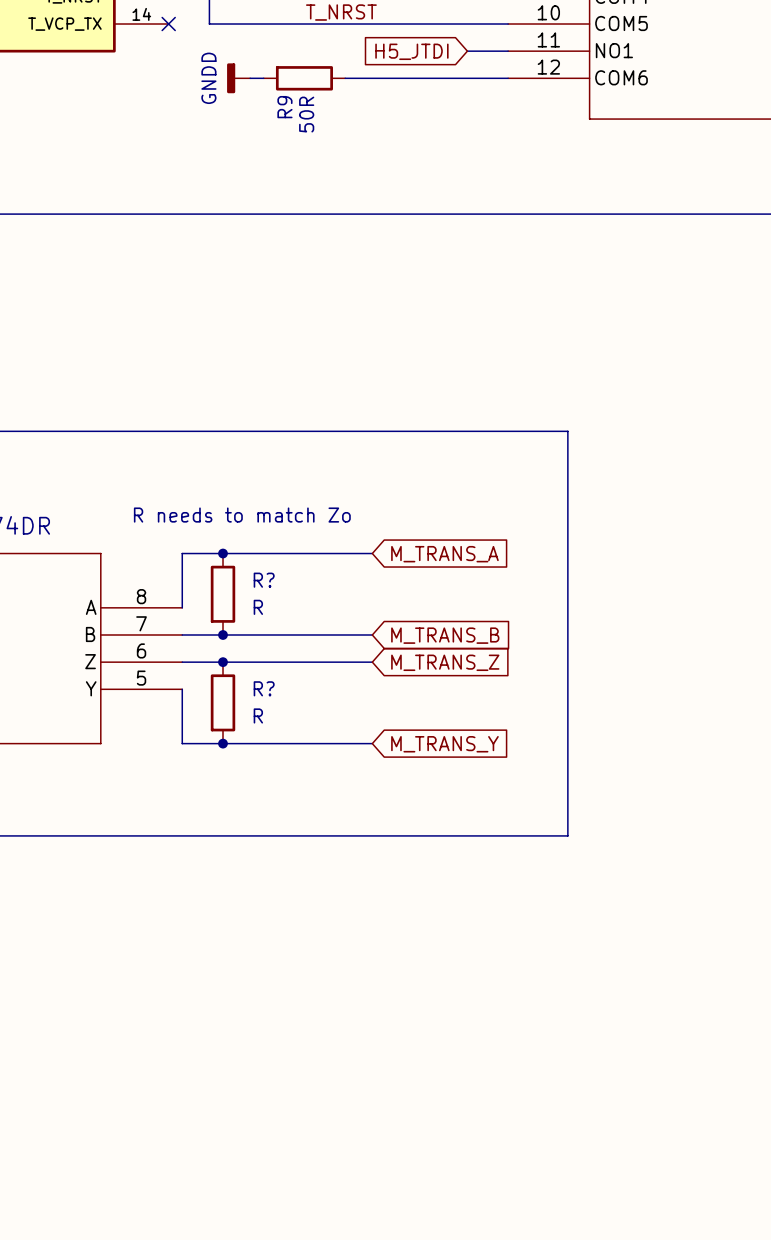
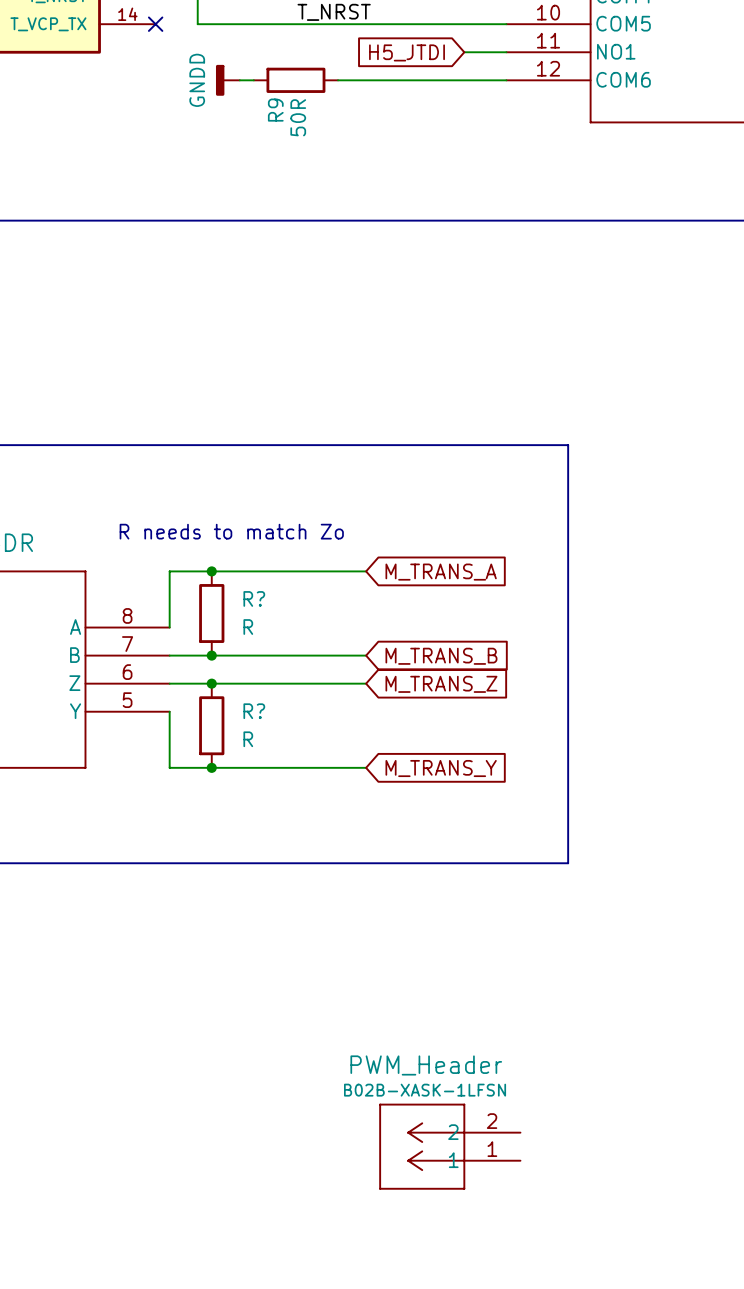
PWM_Header: none -> B02B-XASK-1LFSN (449, 1146)

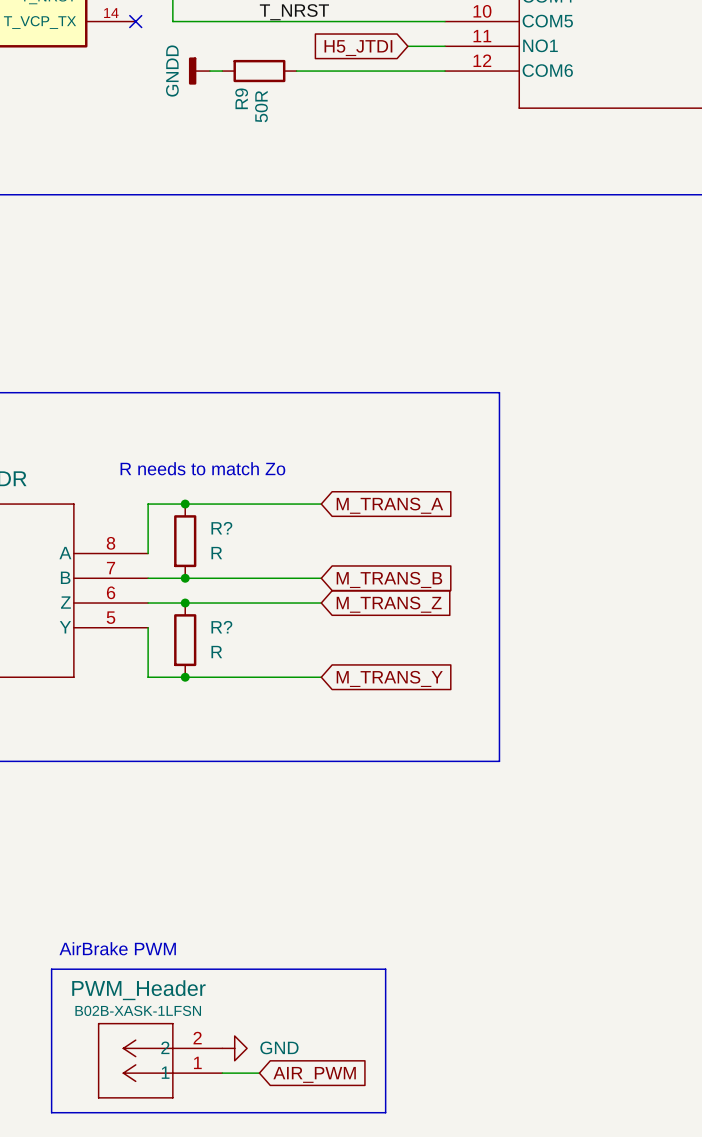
text: none -> AirBrake PWM (117, 948)
line: none -> (51, 969) (385, 969) (385, 1112) (51, 1112) (51, 969)
PWM_Header position: (449, 1146) -> (160, 1060)
power symbol: none -> GND (234, 1048)
wire: none -> (222, 1073) (259, 1073)
global label: none -> AIR_PWM (314, 1074)

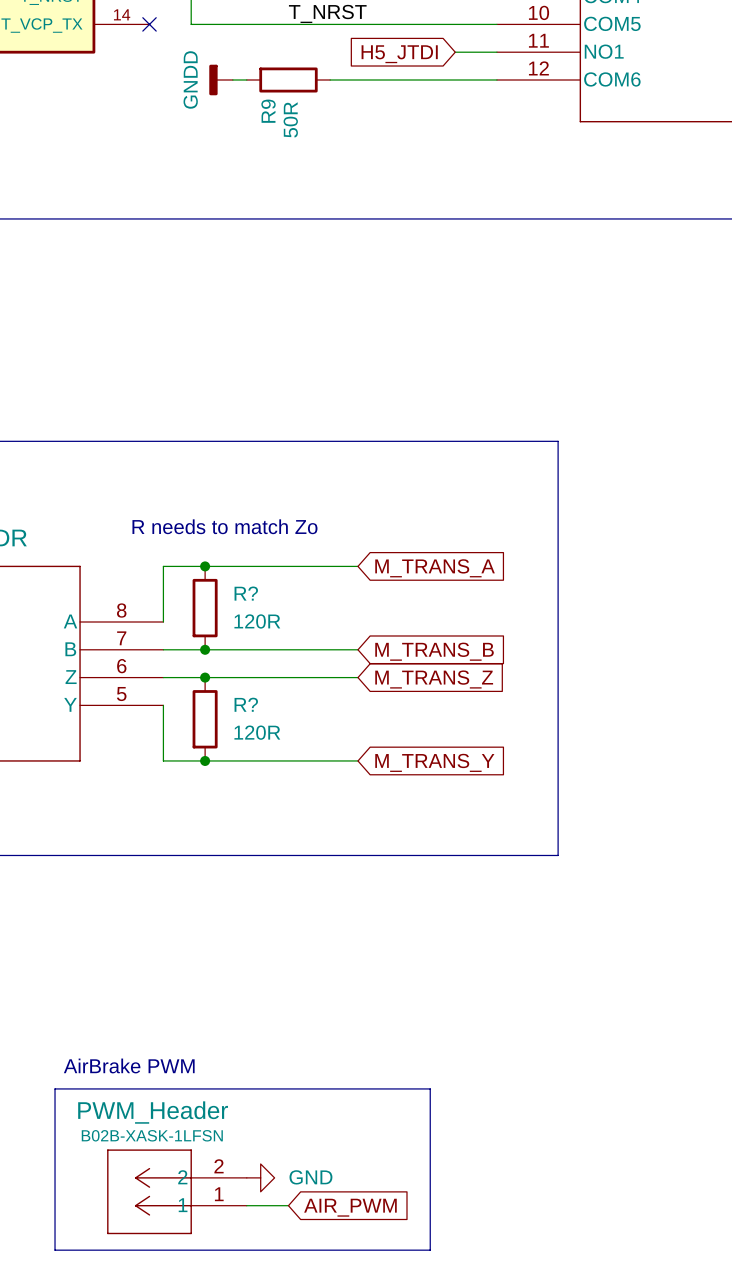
R? value: R (216, 553) -> 120R (257, 621)
R? value: R (216, 652) -> 120R (257, 732)

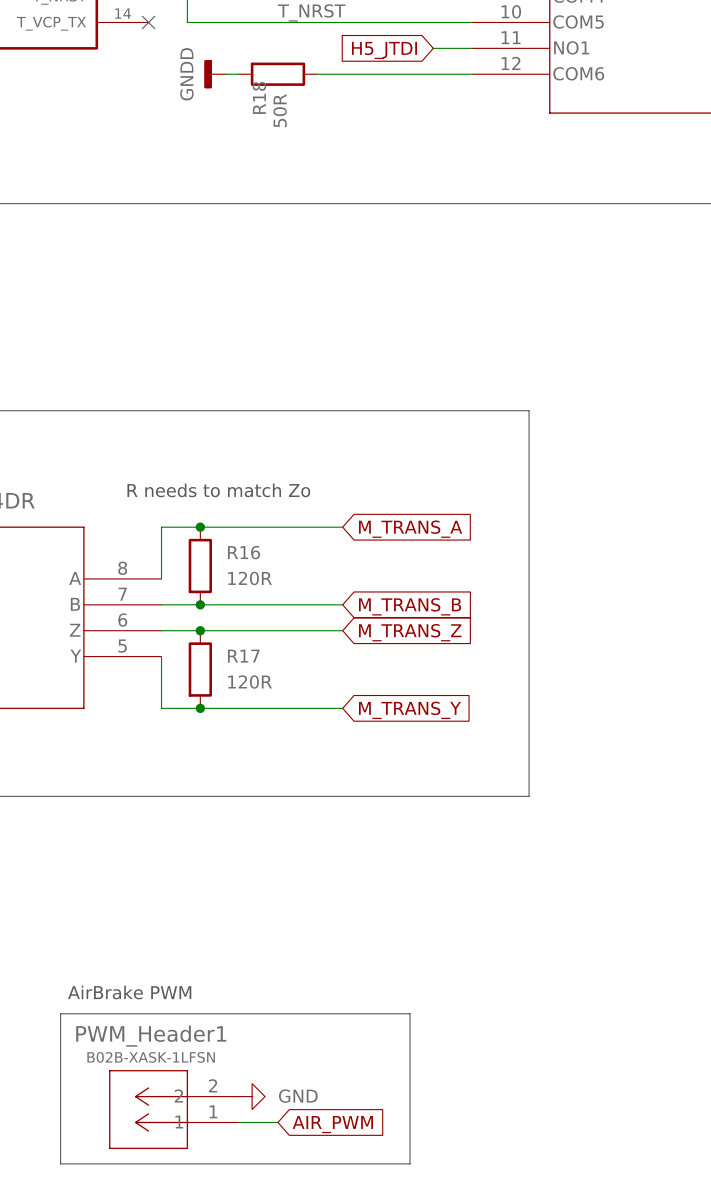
R9 name: R9 (268, 111) -> R18 (259, 97)
R? name: R? (246, 593) -> R16 (243, 552)
R? name: R? (246, 704) -> R17 (243, 656)
PWM_Header name: PWM_Header (153, 1112) -> PWM_Header1 (151, 1036)

